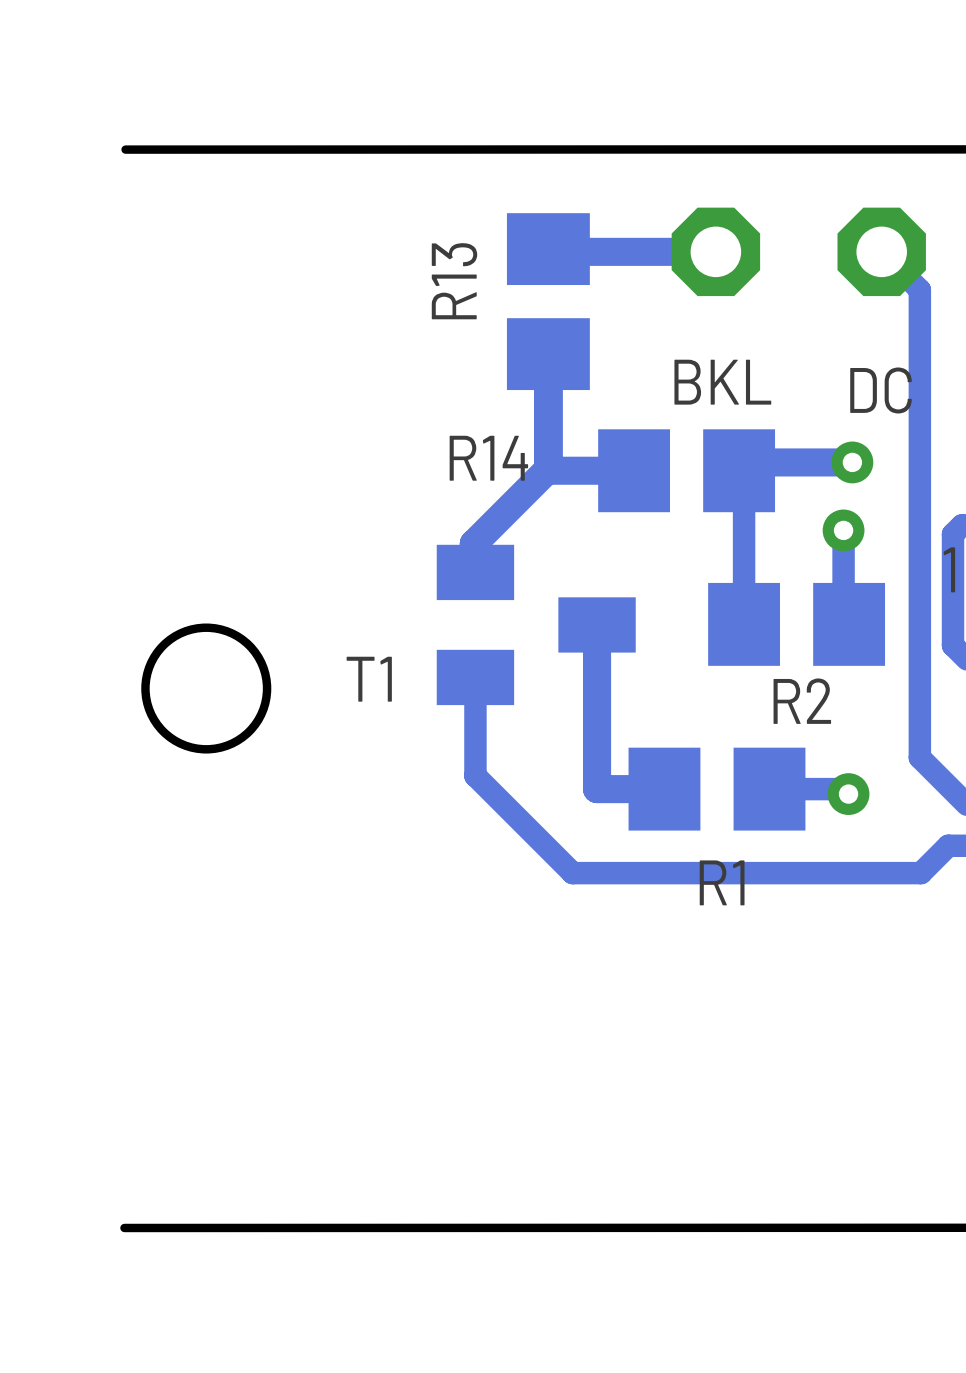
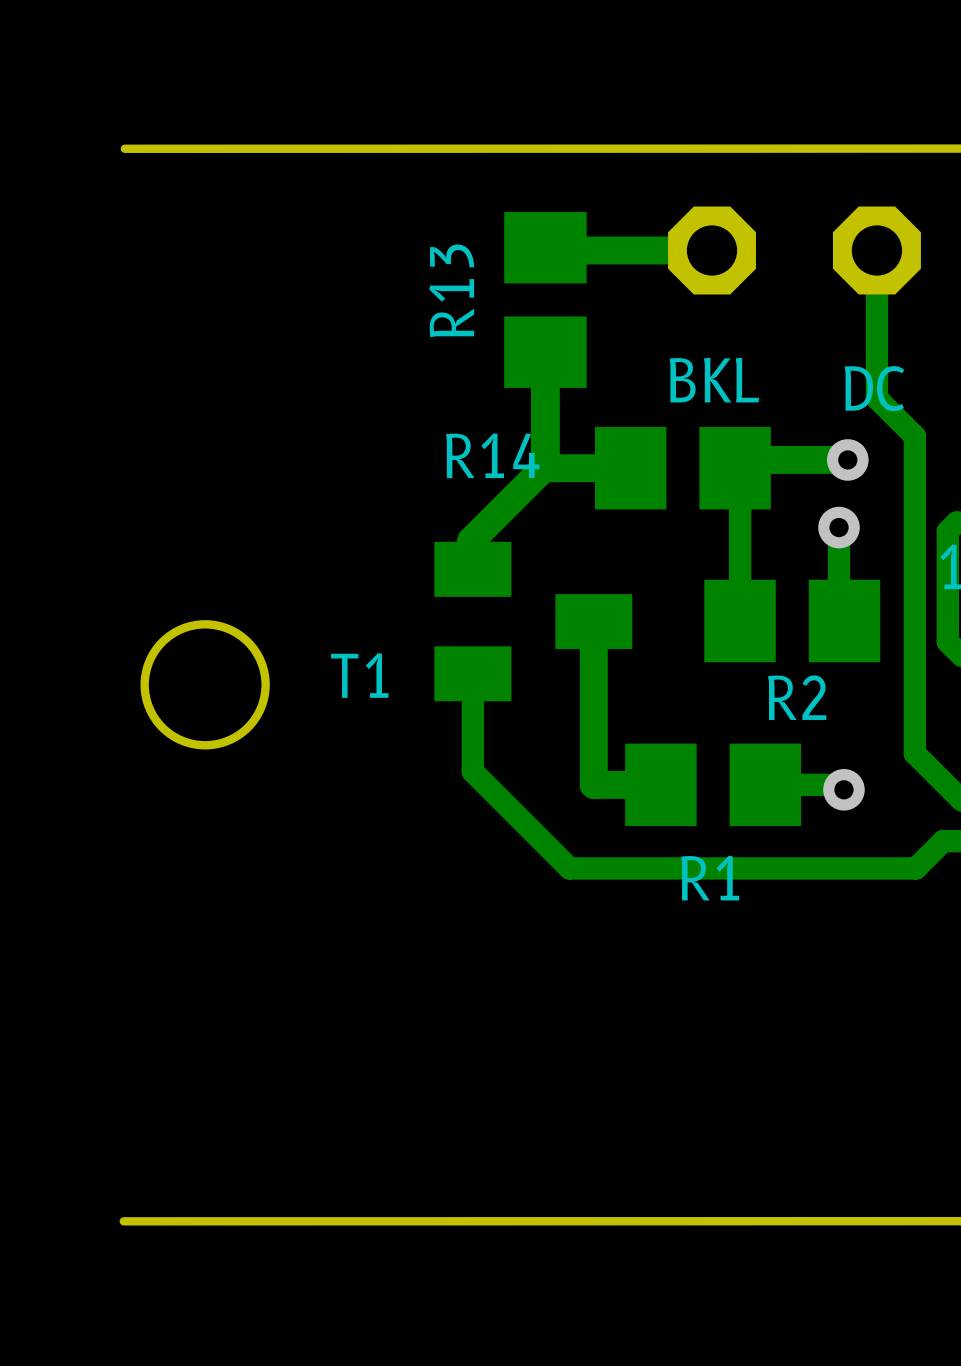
track: (881, 251) (919, 289) (919, 438) -> (876, 250) (876, 398) (914, 436)

